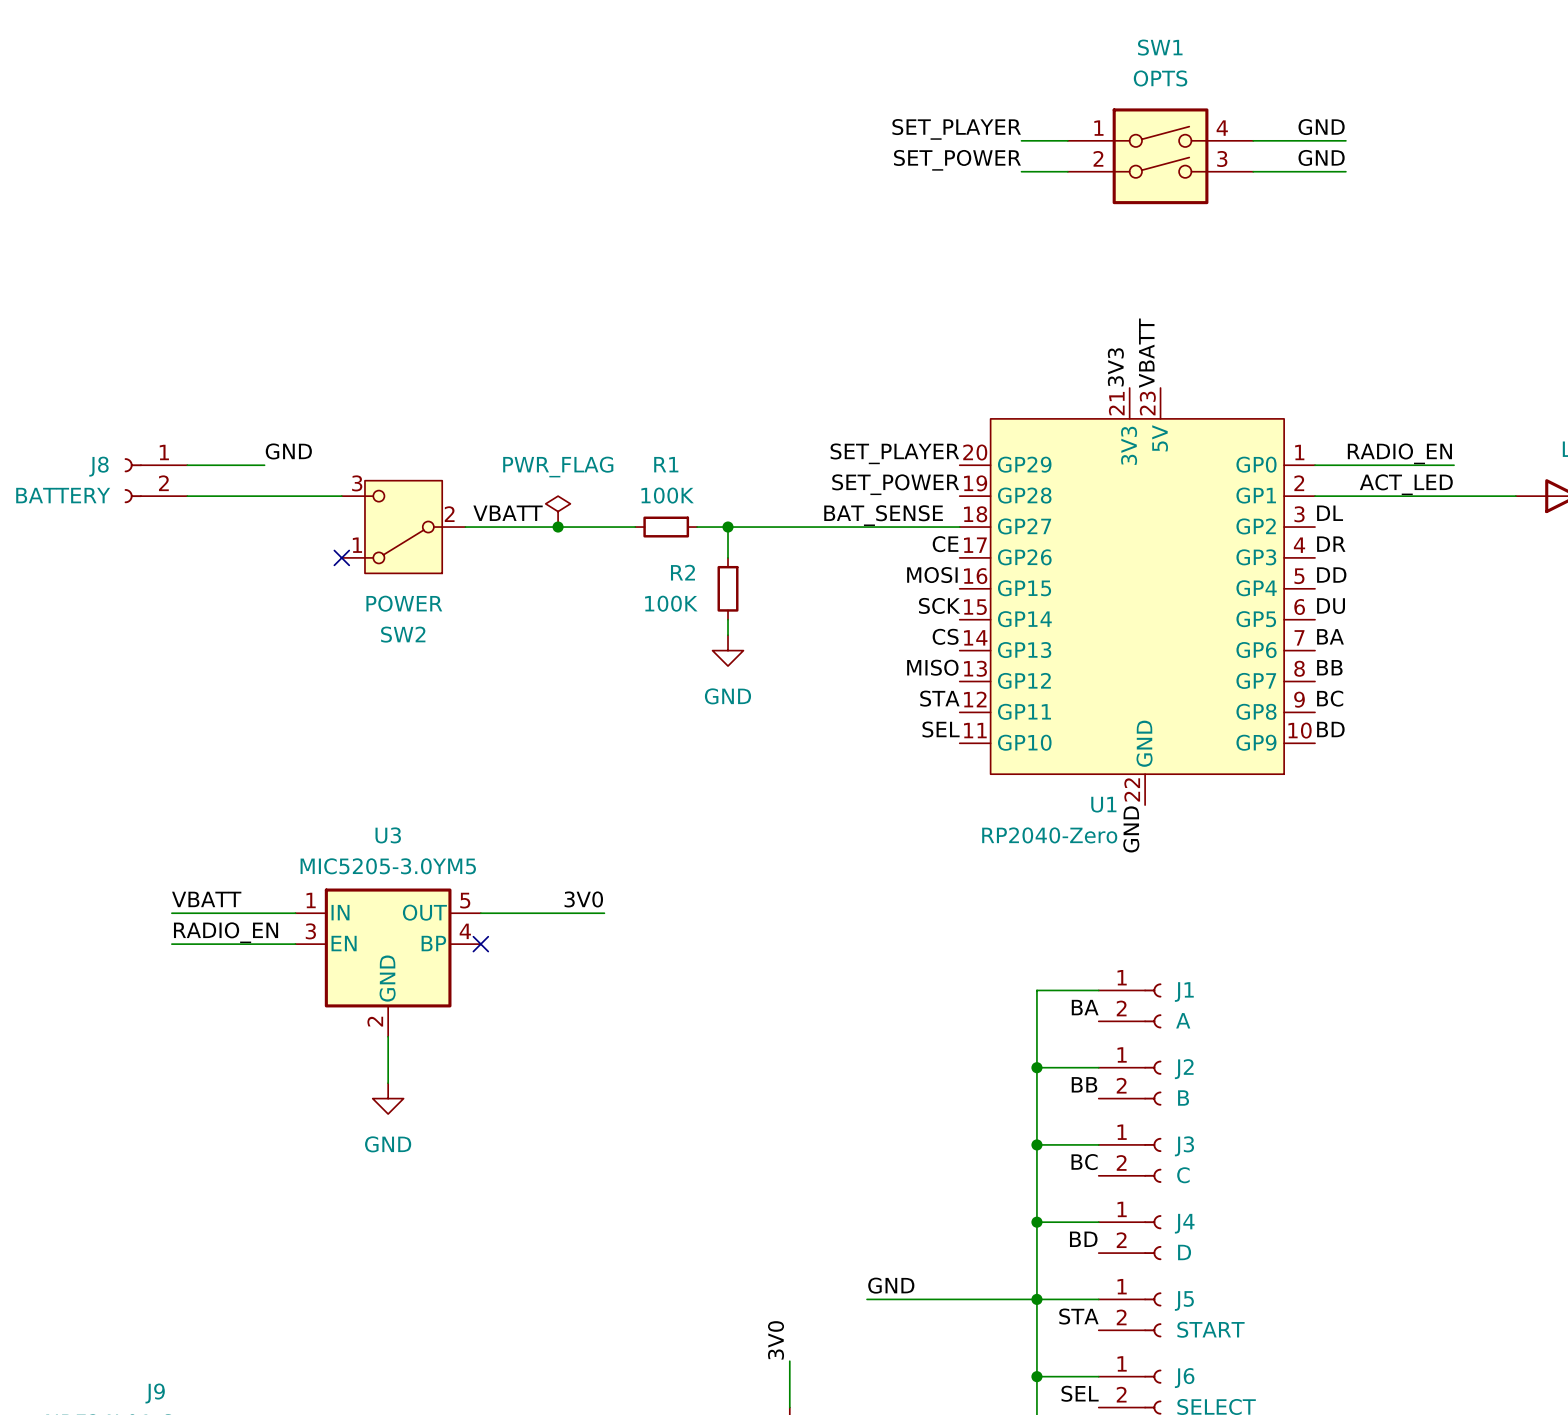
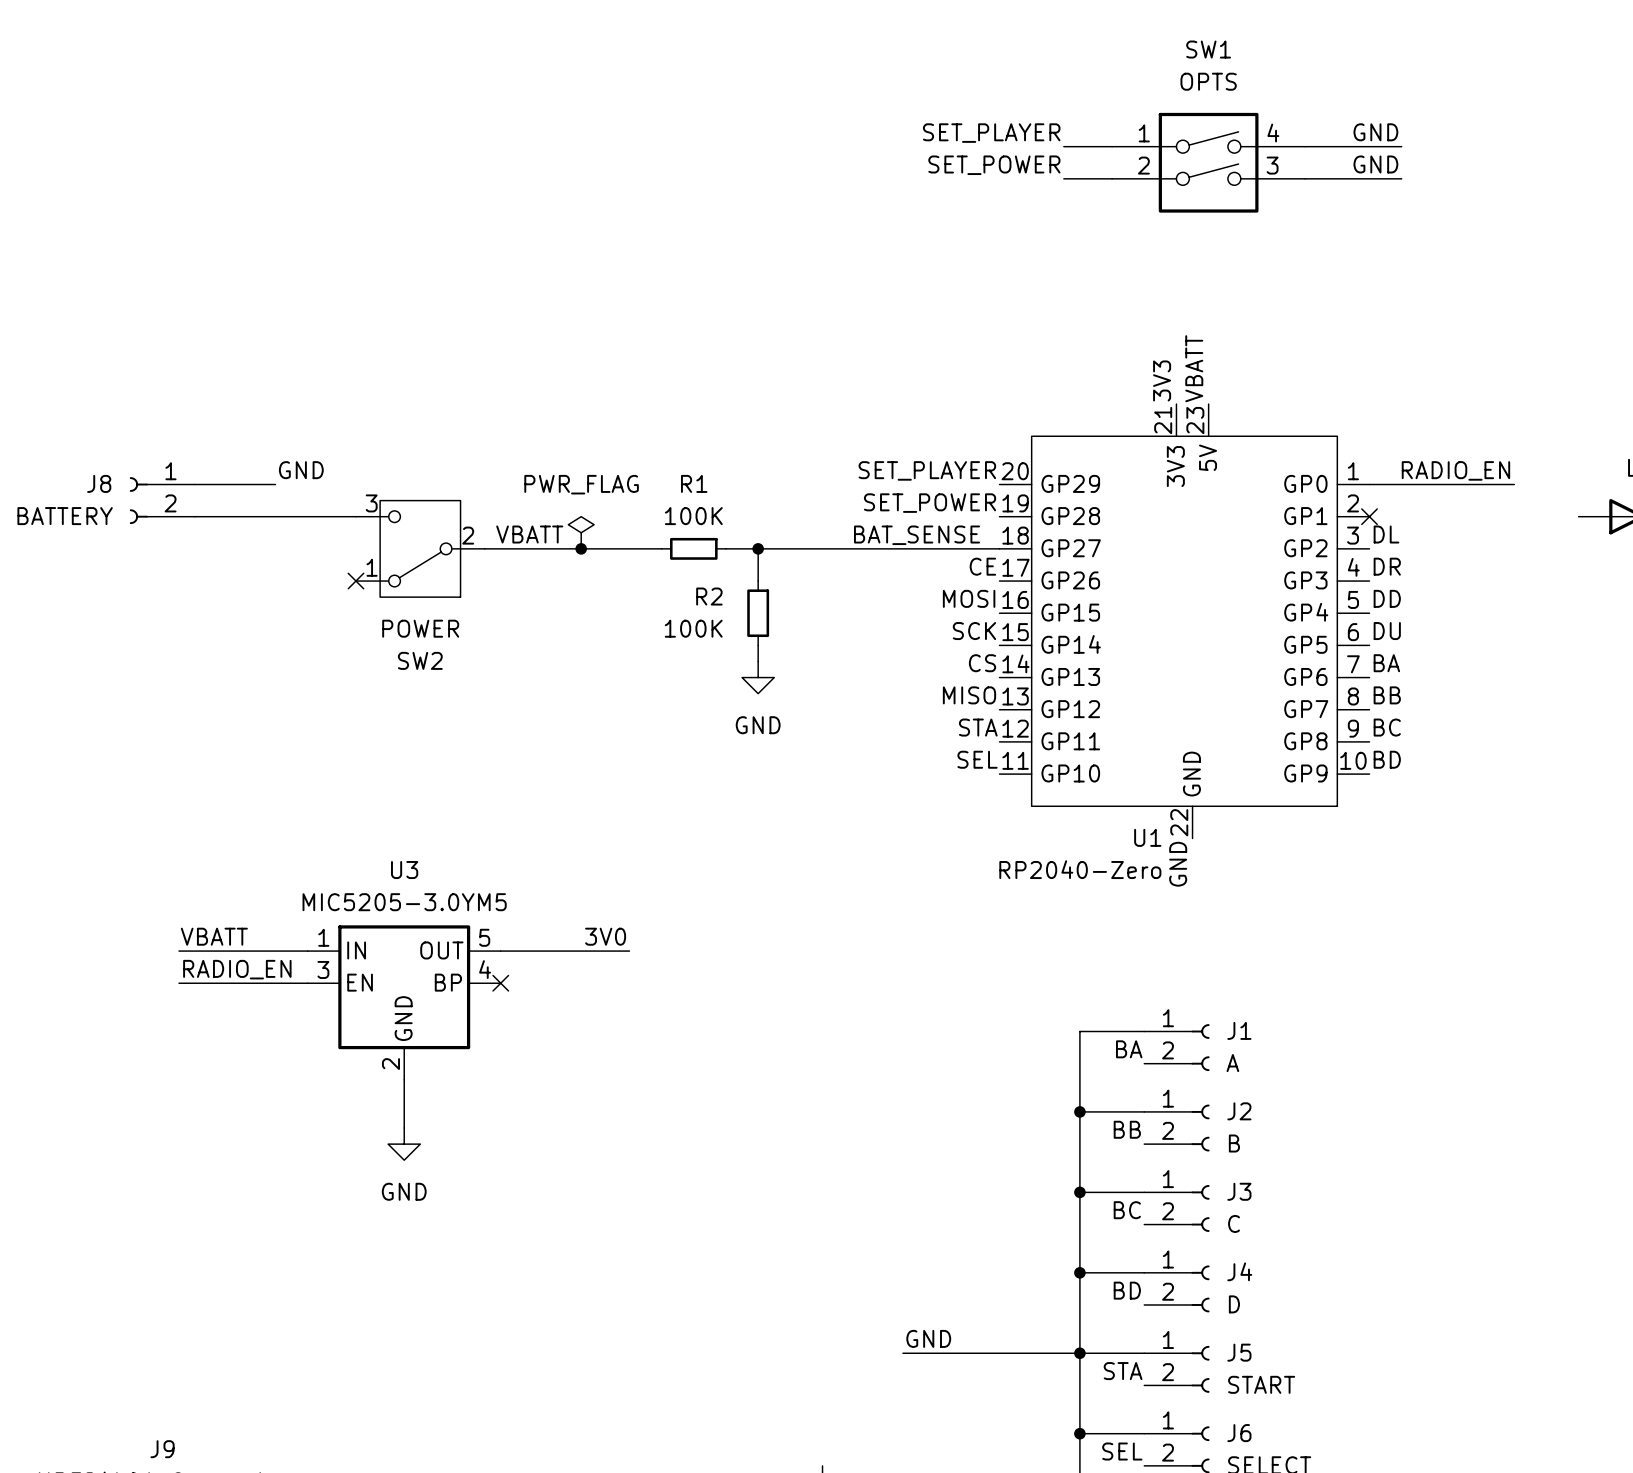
label: ACT_LED (1406, 484) -> none
wire: (1315, 496) (1515, 496) -> none
no-connect mark: none -> (1369, 516)
label: 3V0 (776, 1340) -> none
wire: (789, 1361) (789, 1407) -> none

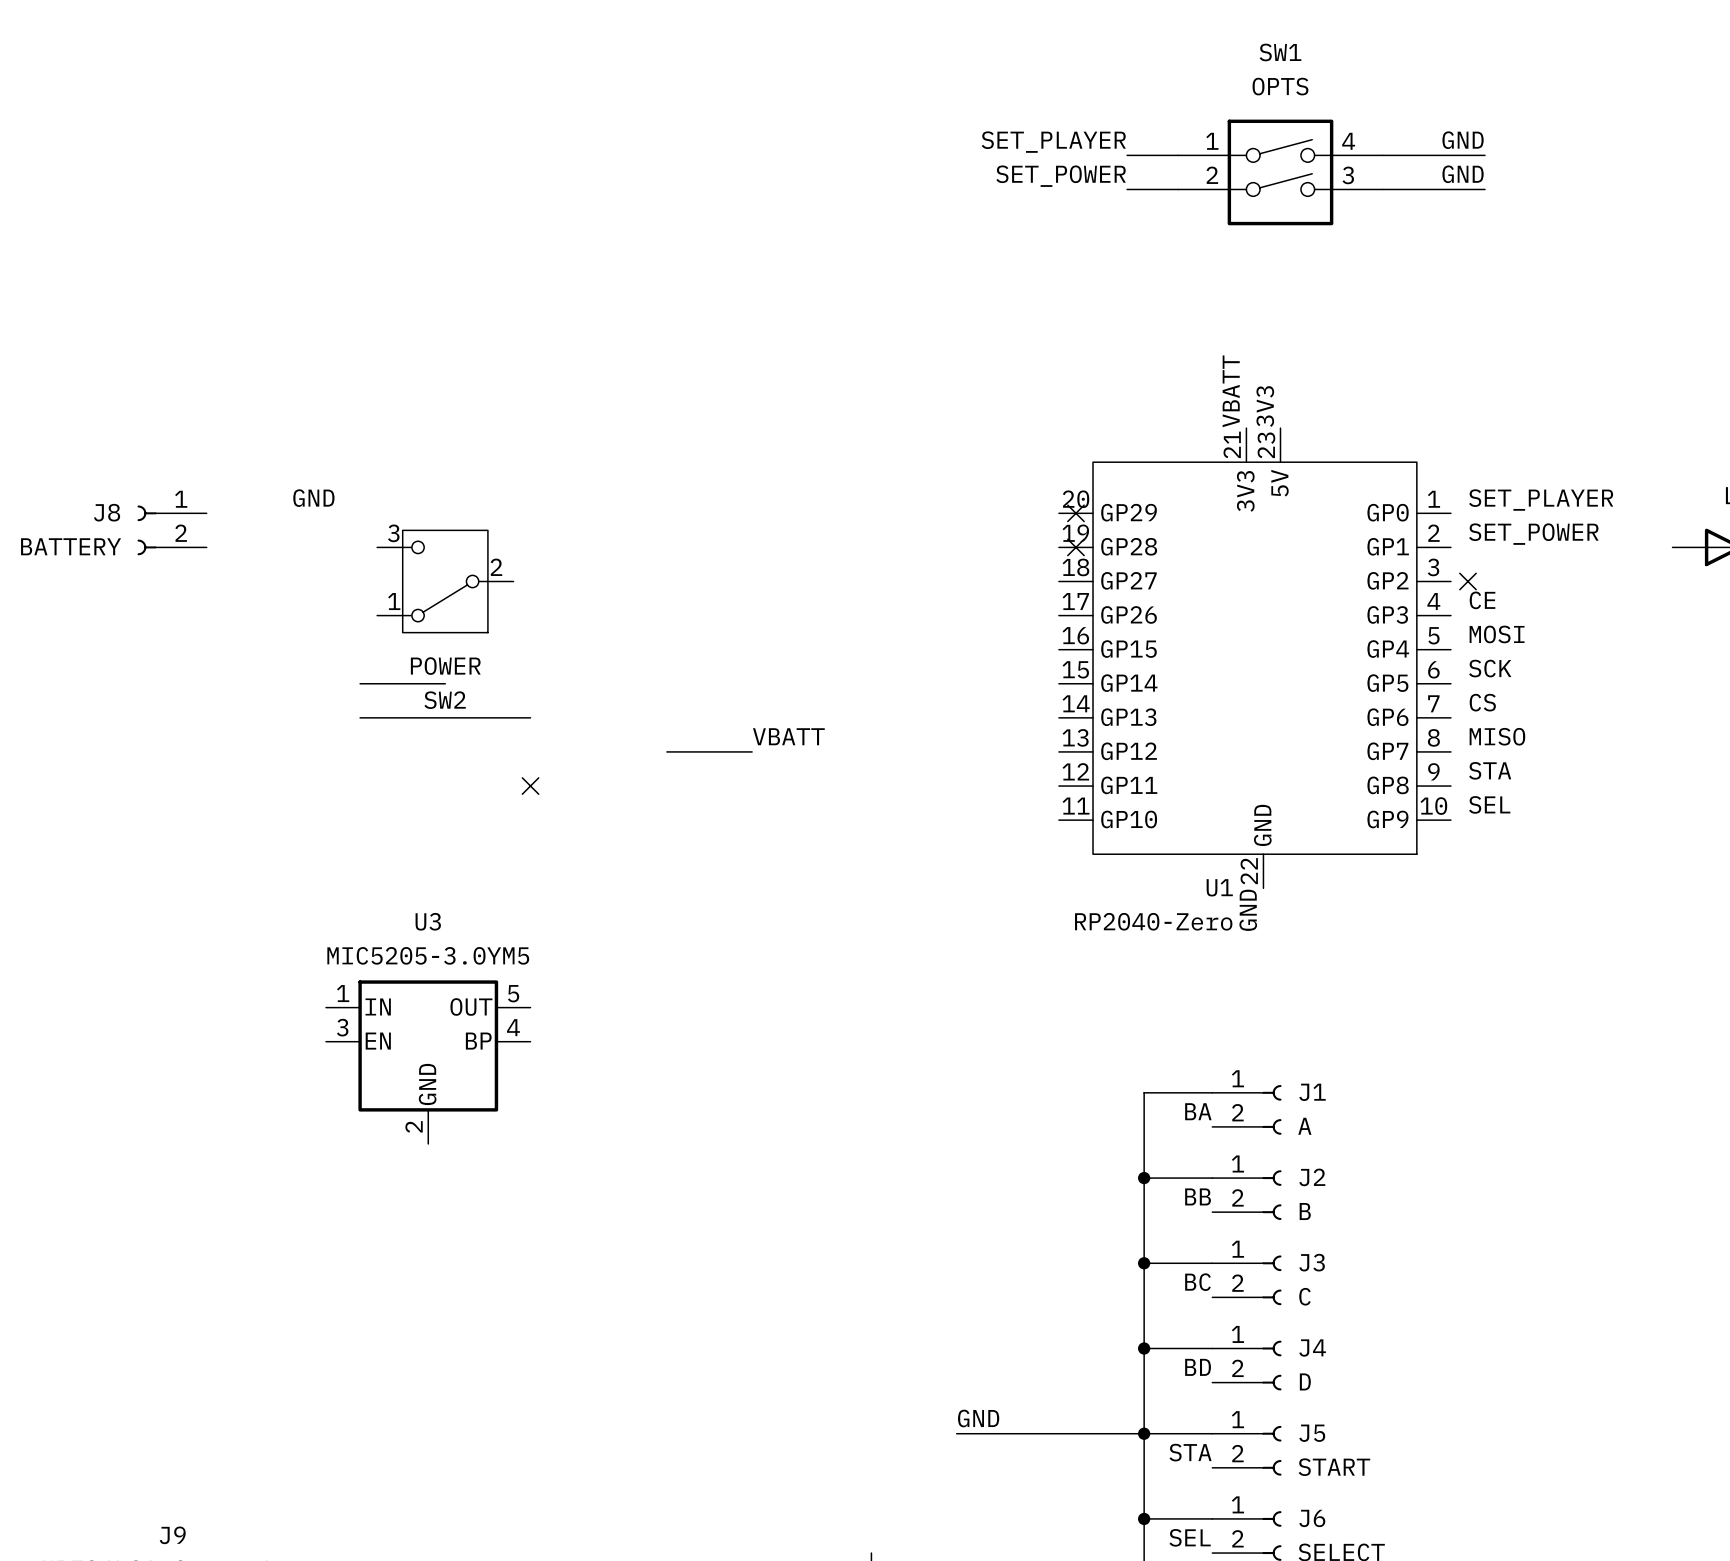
label: VBATT (1194, 368) -> 3V3 (1265, 406)
label: 3V3 (1162, 380) -> VBATT (1231, 391)
label: SET_PLAYER (927, 470) -> none
label: RADIO_EN (1455, 470) -> none
label: none -> SET_PLAYER (1541, 500)
wire: (195, 484) (275, 484) -> (360, 683) (445, 683)
no-connect mark: none -> (1075, 513)
wire: (1369, 484) (1514, 484) -> none
label: SET_POWER (930, 503) -> none
label: none -> SET_POWER (1533, 534)
wire: (195, 516) (355, 516) -> (360, 717) (530, 717)
no-connect mark: none -> (1075, 547)
no-connect mark position: (1369, 516) -> (1467, 581)
power symbol: PWR_FLAG (581, 532) -> none
label position: VBATT (529, 534) -> VBATT (788, 736)
label: DL (1386, 534) -> none
label: BAT_SENSE (917, 535) -> none
wire: (484, 548) (661, 548) -> none
junction: (581, 548) -> none
R1: 100K (693, 548) -> none
wire: (725, 548) (999, 548) -> none
wire: (758, 548) (758, 581) -> none
junction: (758, 548) -> none
label: CE (982, 566) -> none
label: DR (1387, 566) -> none
label: none -> CE (1482, 600)
no-connect mark: (355, 581) -> none
label: MOSI (969, 598) -> none
label: DD (1387, 598) -> none
label: none -> MOSI (1497, 634)
R2: 100K (758, 613) -> none
label: SCK (974, 631) -> none
label: DU (1387, 631) -> none
label: none -> SCK (1490, 668)
wire: (758, 645) (758, 661) -> none
label: CS (982, 663) -> none
label: BA (1386, 663) -> none
label: none -> CS (1482, 702)
power symbol: GND (758, 677) -> none
label: MISO (969, 695) -> none
label: BB (1387, 695) -> none
label: none -> MISO (1497, 736)
wire: none -> (666, 751) (752, 751)
label: STA (978, 727) -> none
label: BC (1387, 727) -> none
label: none -> STA (1490, 770)
no-connect mark: none -> (530, 786)
label: SEL (977, 759) -> none
label: BD (1387, 759) -> none
label: none -> SEL (1489, 804)
label: VBATT (214, 936) -> none
label: 3V0 (605, 936) -> none
wire: (179, 951) (307, 951) -> none
wire: (500, 951) (629, 951) -> none
label: RADIO_EN (237, 969) -> none
wire: (179, 983) (307, 983) -> none
no-connect mark: (500, 983) -> none
wire: (404, 1079) (404, 1128) -> none
power symbol: GND (404, 1144) -> none

